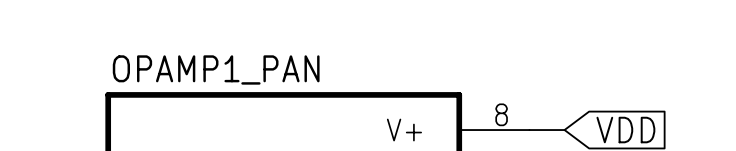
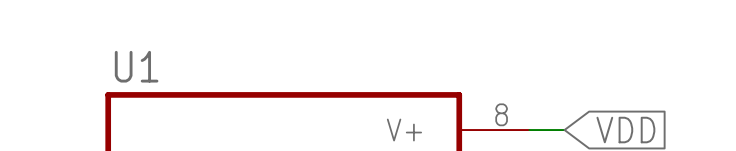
OPAMP1_PAN name: OPAMP1_PAN (216, 69) -> U1 (136, 66)

